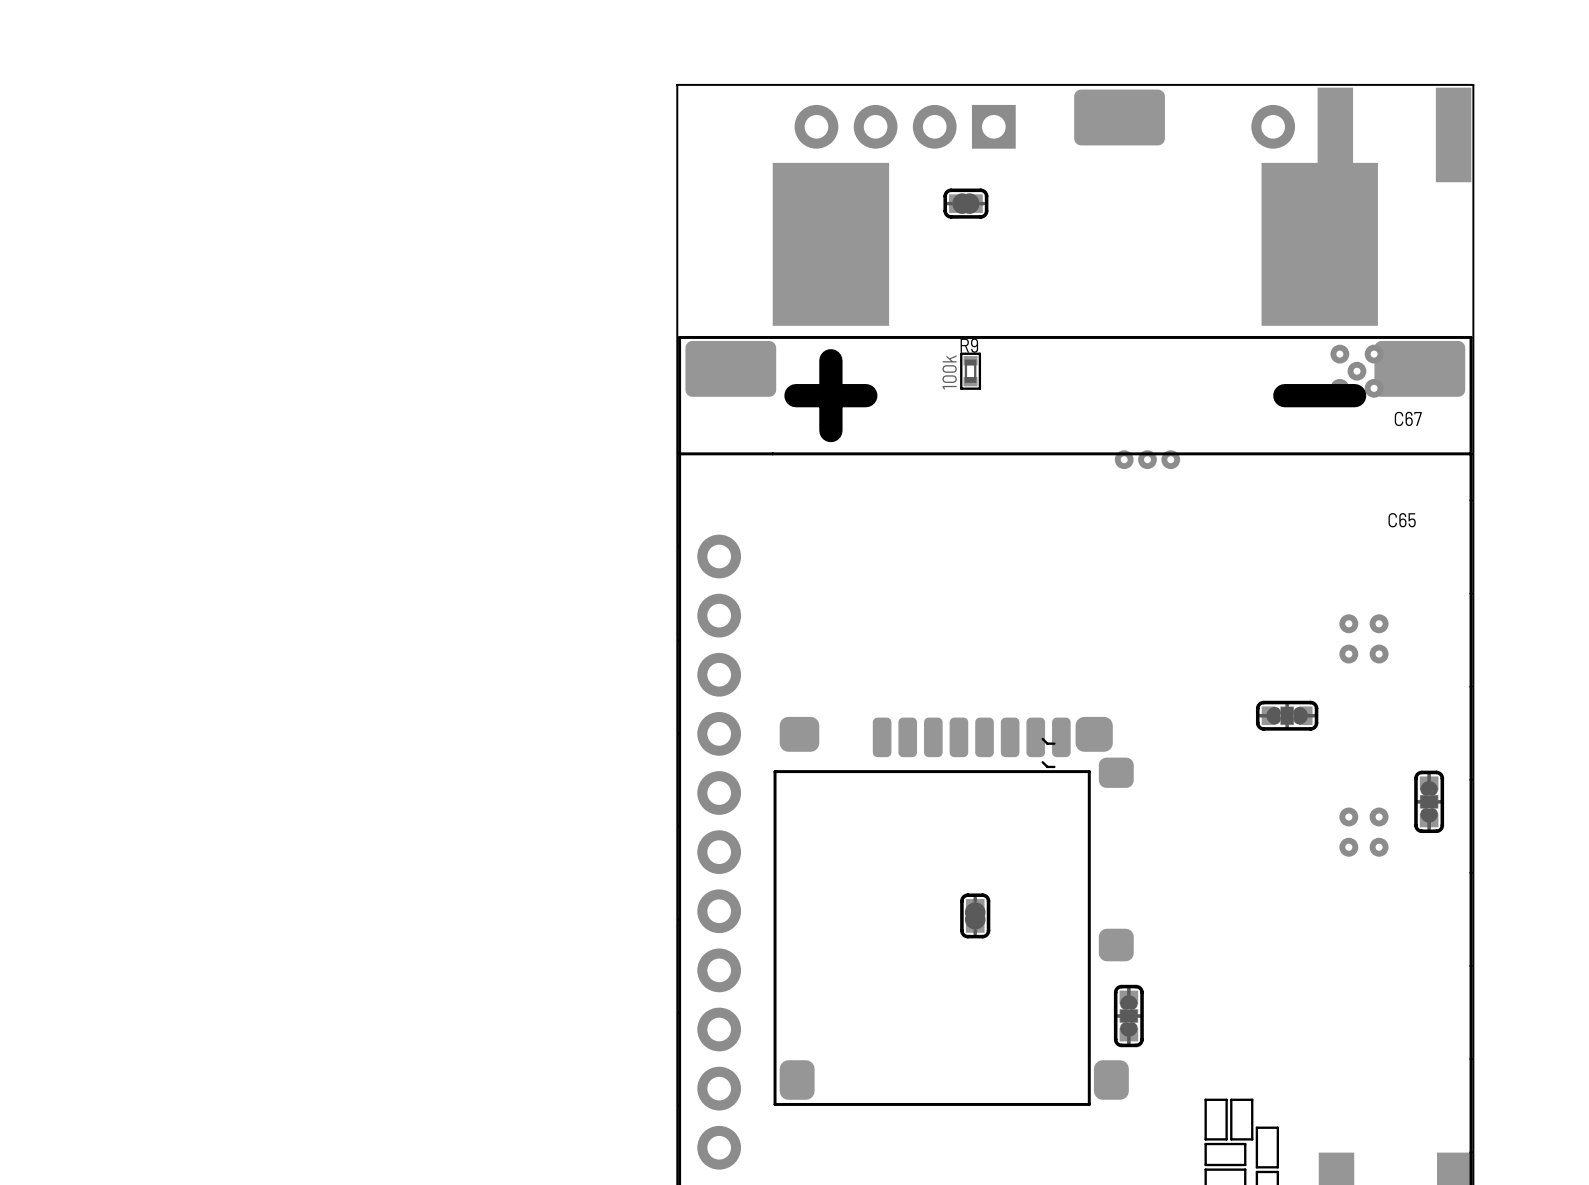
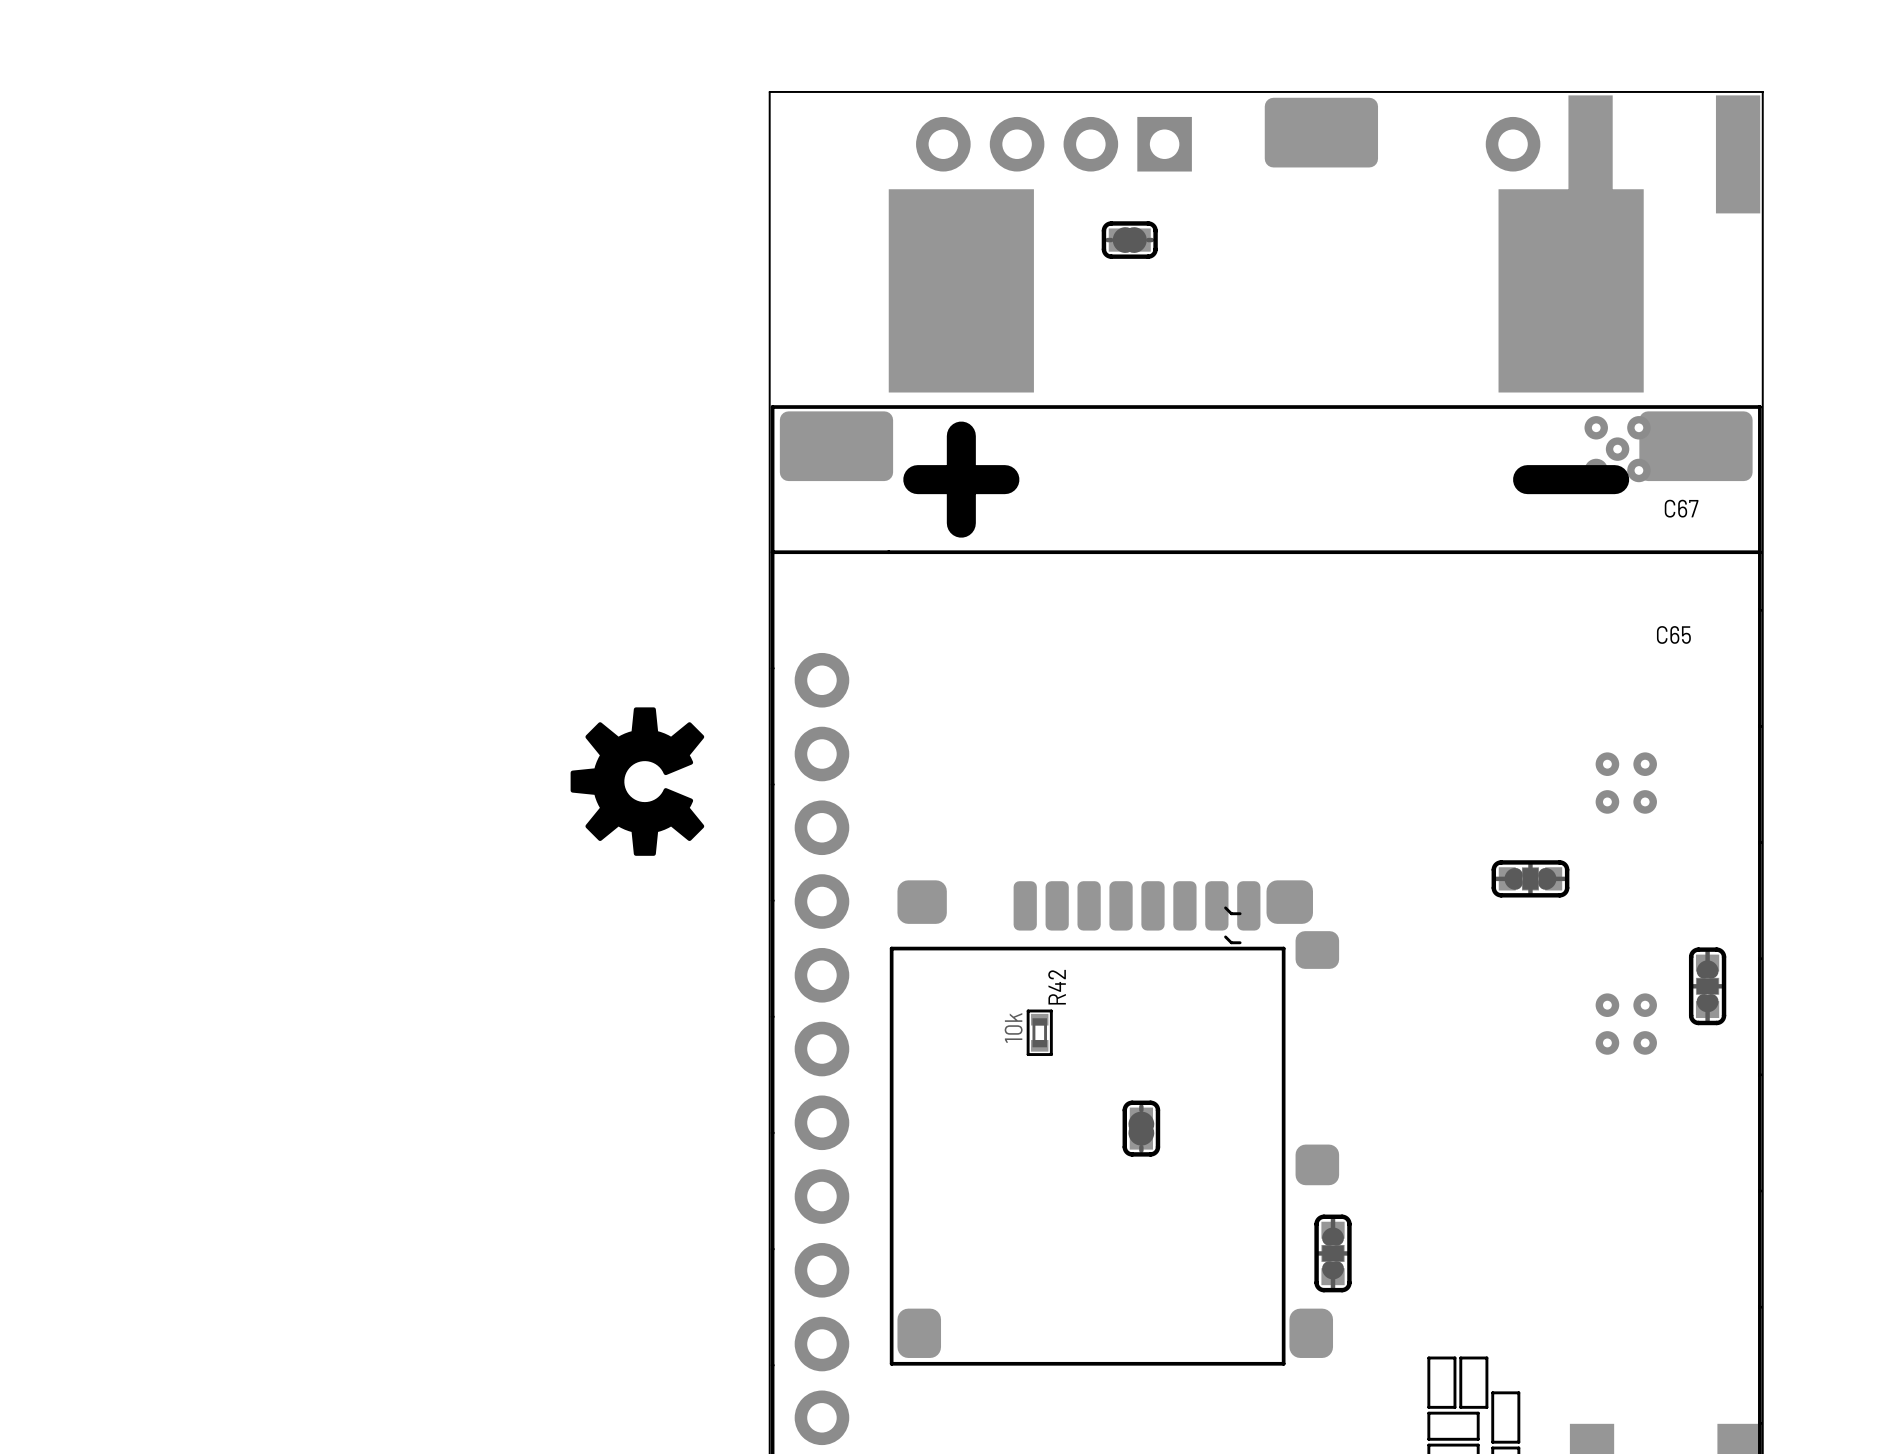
R9: 100k (970, 371) -> none
part: (1147, 459) -> none
drawing: none -> [570, 707, 705, 856]
R42: none -> 10k (1039, 1032)

